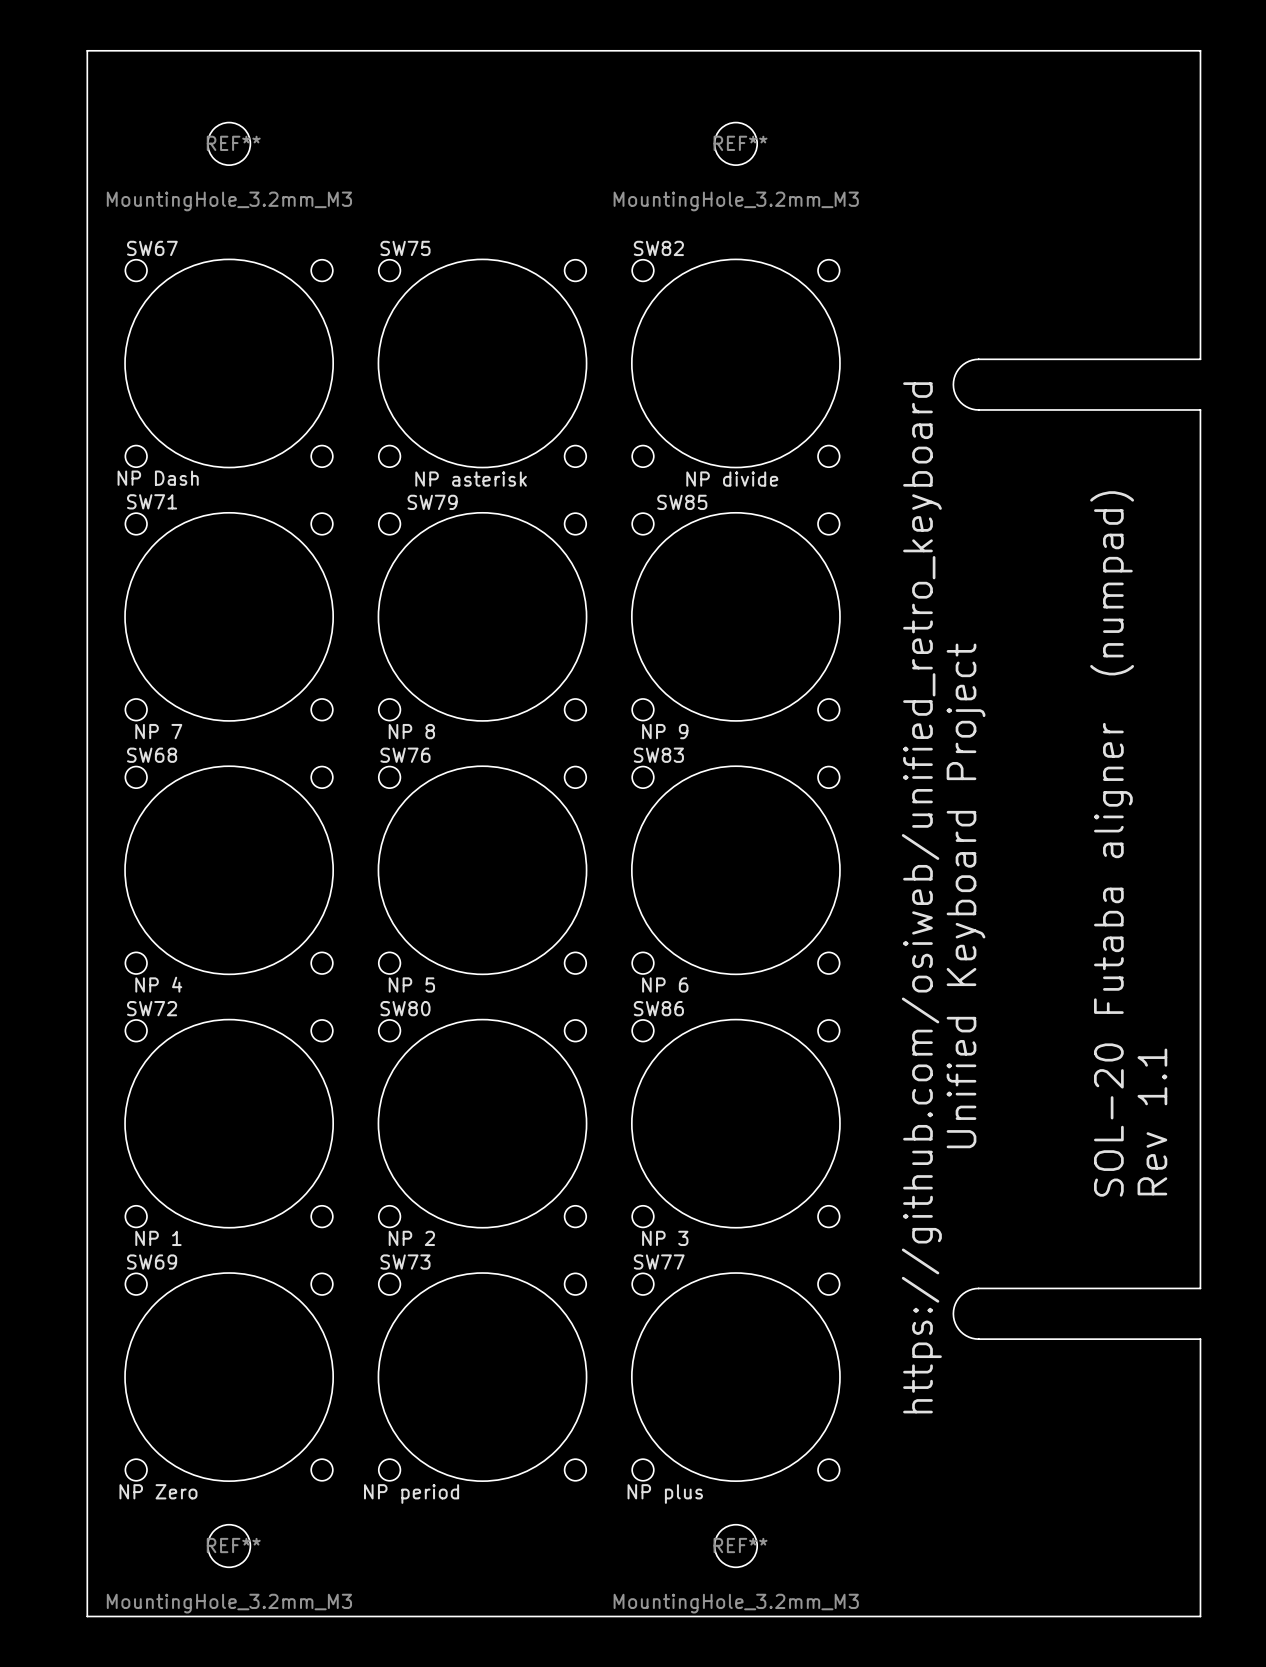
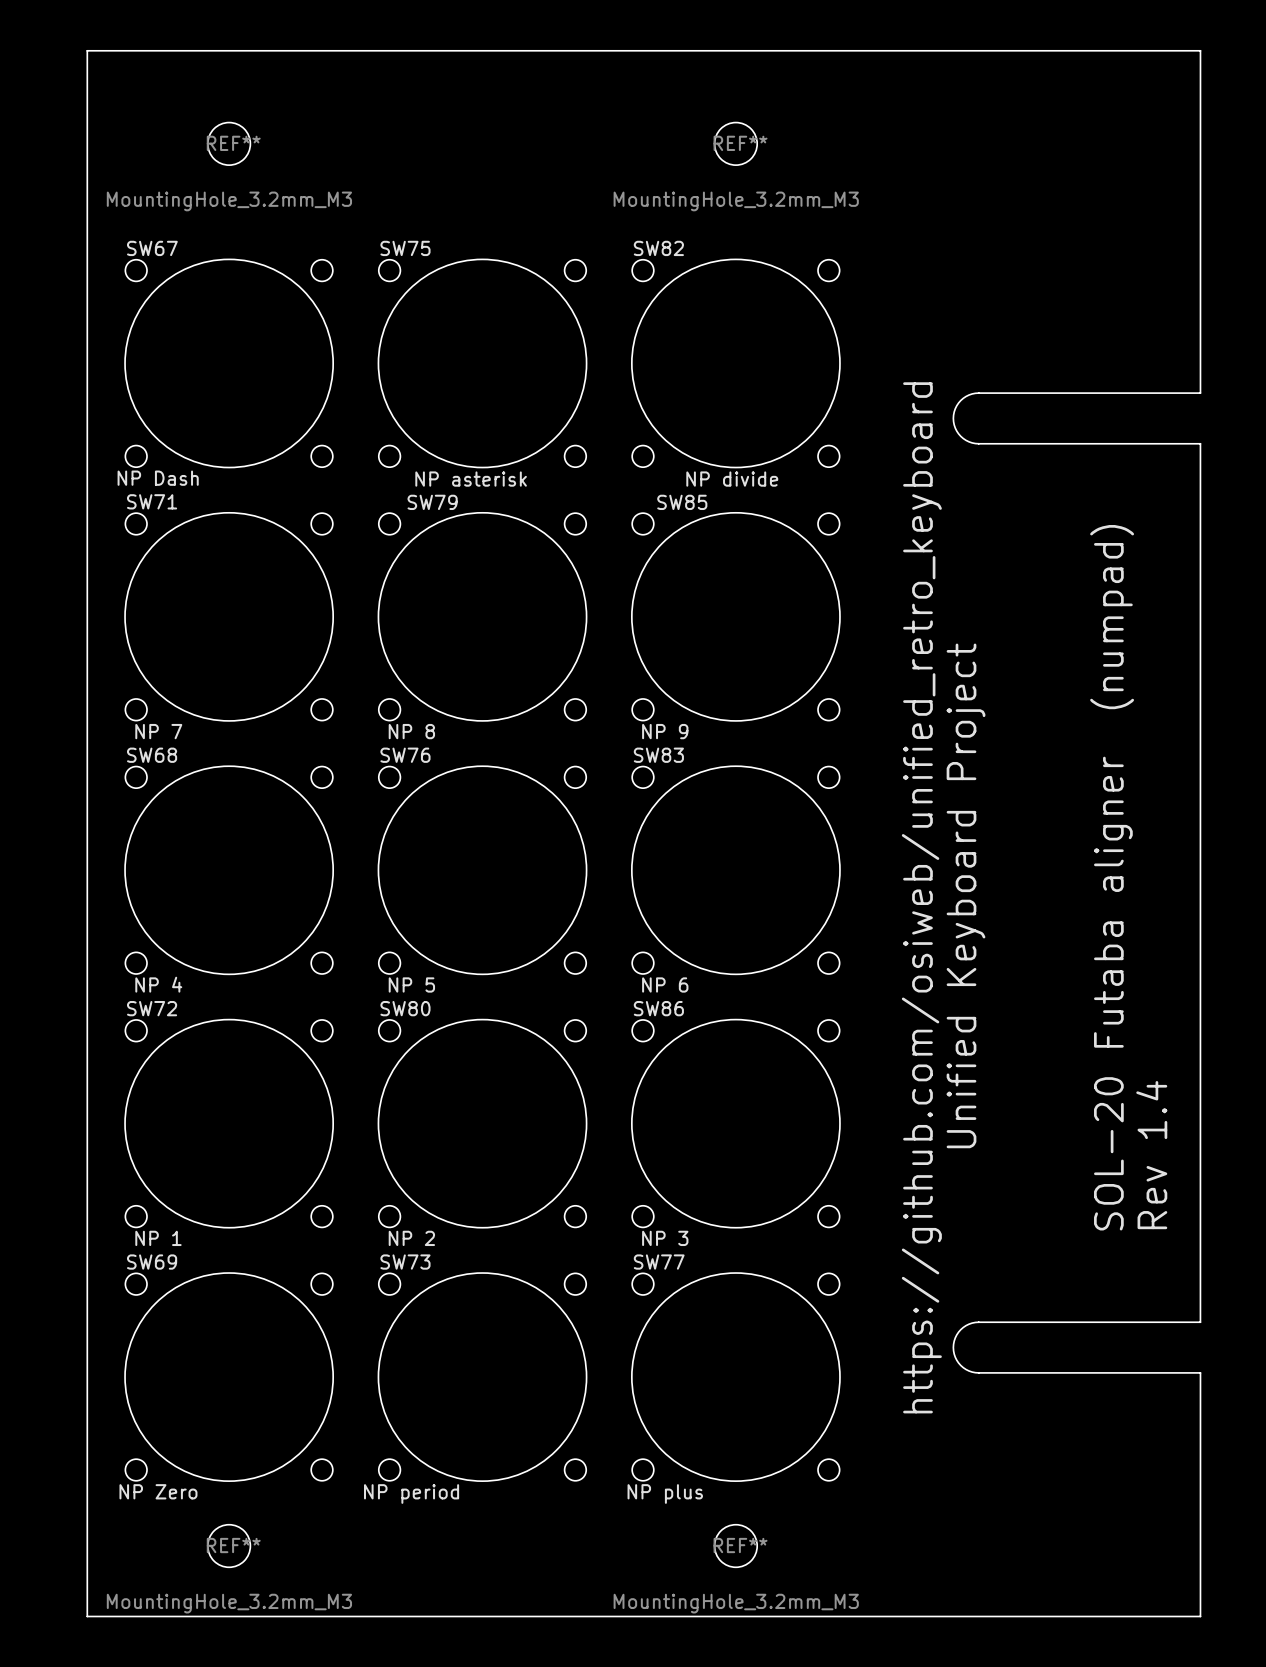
board edge: (1200, 359) (975, 359) (966, 362) (958, 369) (953, 384) (955, 394) (960, 402) (975, 409) (1200, 409) (1200, 443) -> (1200, 393) (975, 393) (966, 396) (958, 403) (953, 418) (955, 428) (960, 436) (975, 443) (1200, 443)
board edge: none -> (1200, 359) (1200, 393)
text position: SOL-20 Futaba aligner (numpad) (1112, 843) -> SOL-20 Futaba aligner (numpad) (1112, 877)
text: Rev 1.1 (1152, 1121) -> Rev 1.4 (1151, 1155)
board edge: (1200, 1288) (975, 1288) (966, 1291) (958, 1298) (953, 1313) (955, 1323) (960, 1331) (975, 1338) (1200, 1339) -> (1200, 1288) (1200, 1322) (975, 1322) (966, 1325) (958, 1332) (953, 1347) (955, 1357) (960, 1365) (975, 1372) (1200, 1372)
board edge: (1200, 1339) (1200, 1372) -> none

